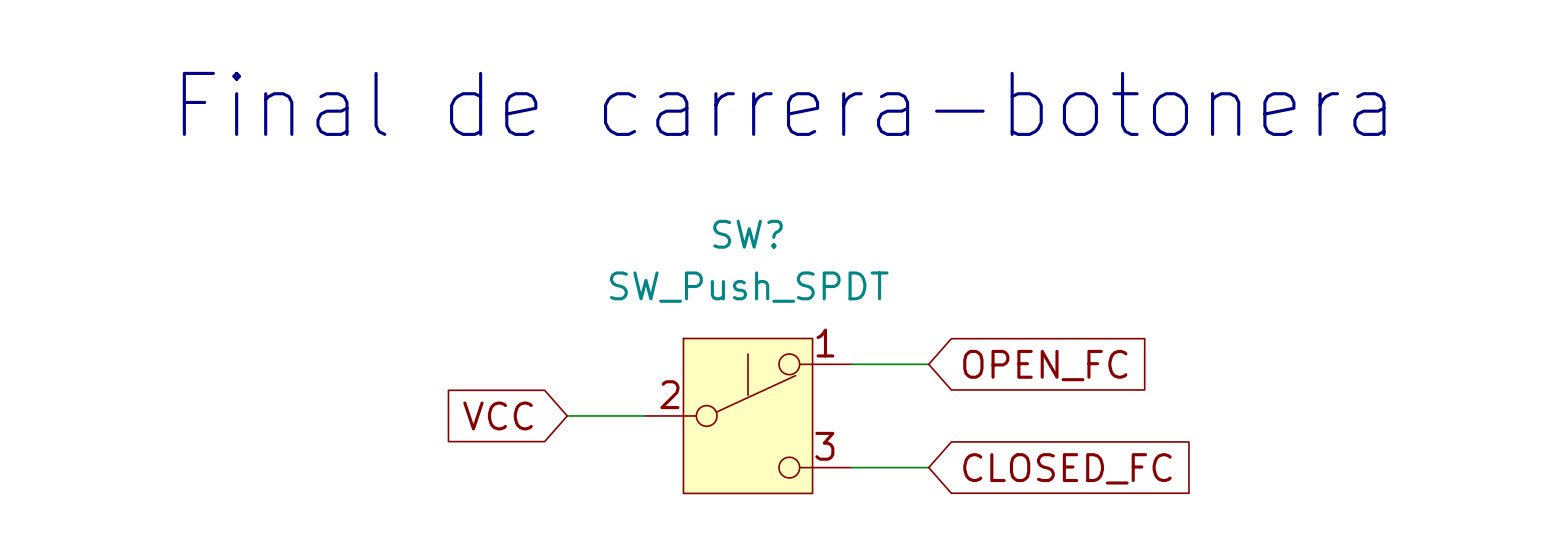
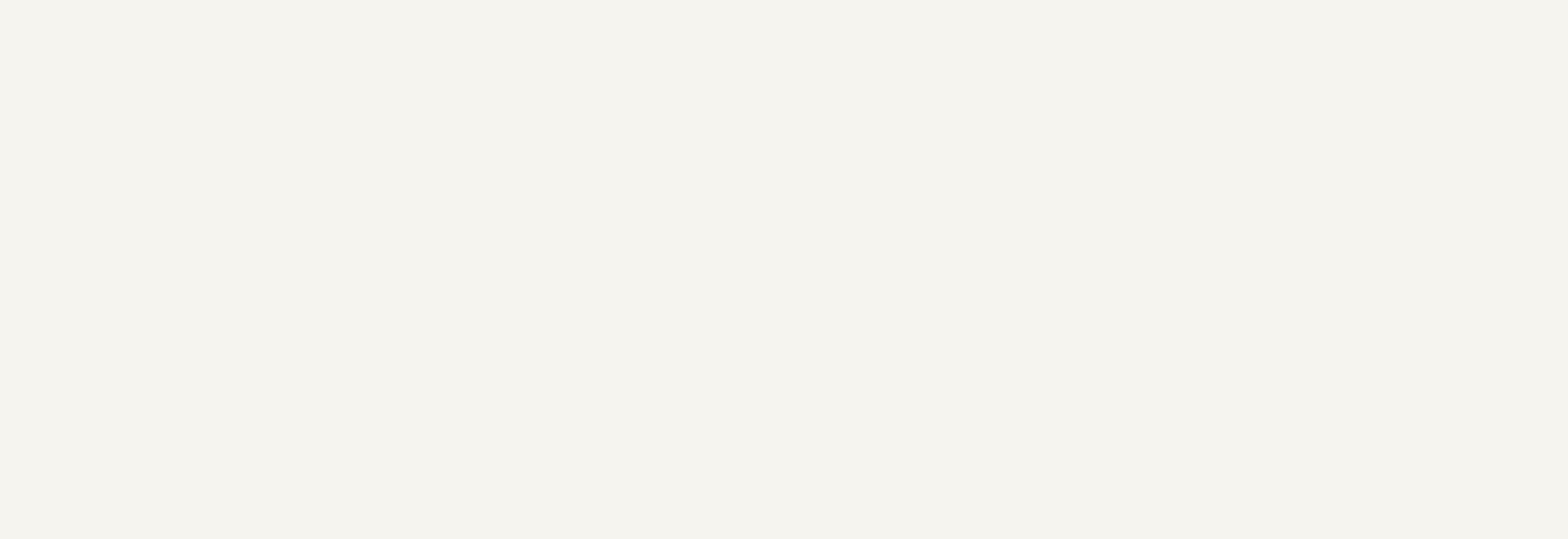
text: Final de carrera-botonera (784, 103) -> none
wire: (851, 364) (928, 364) -> none
global label: OPEN_FC (1045, 365) -> none
global label: VCC (498, 415) -> none
wire: (567, 415) (644, 415) -> none
SW?: SW_Push_SPDT (748, 415) -> none
wire: (851, 467) (928, 467) -> none
global label: CLOSED_FC (1067, 468) -> none

